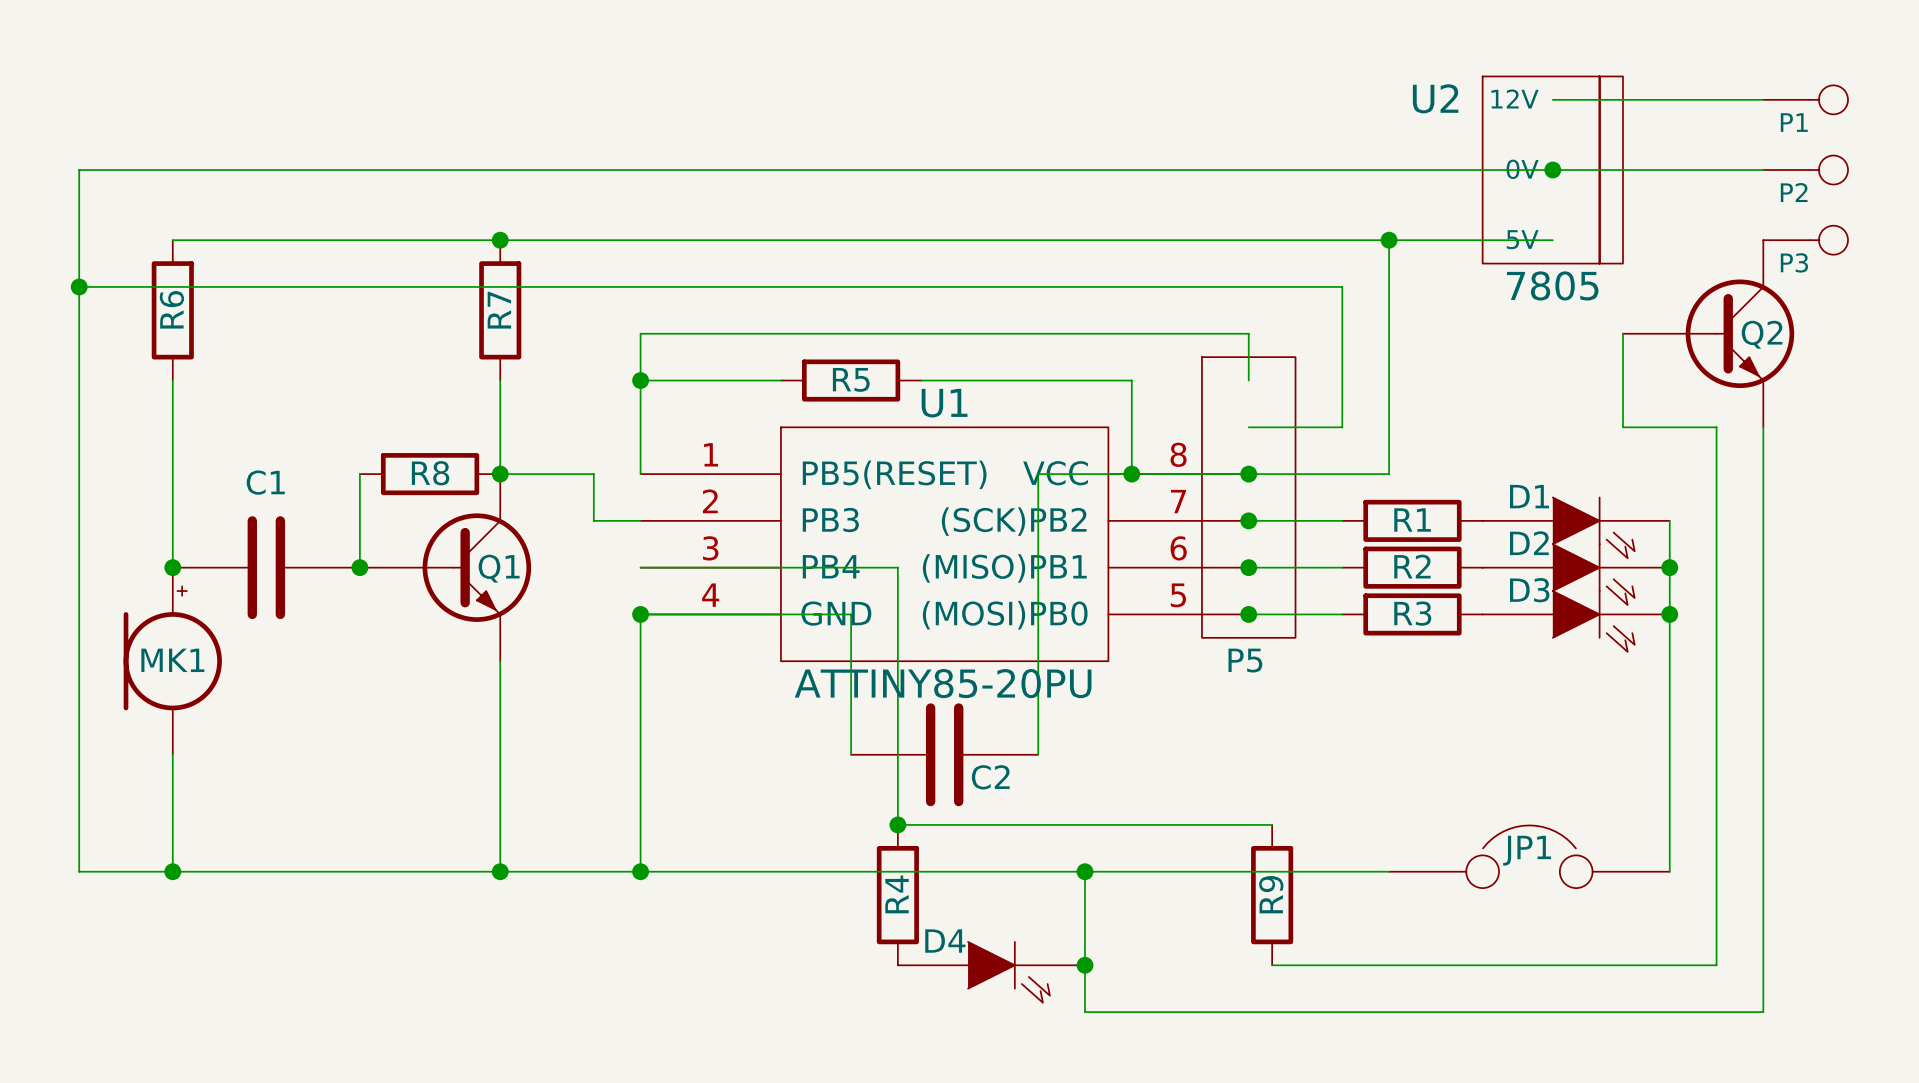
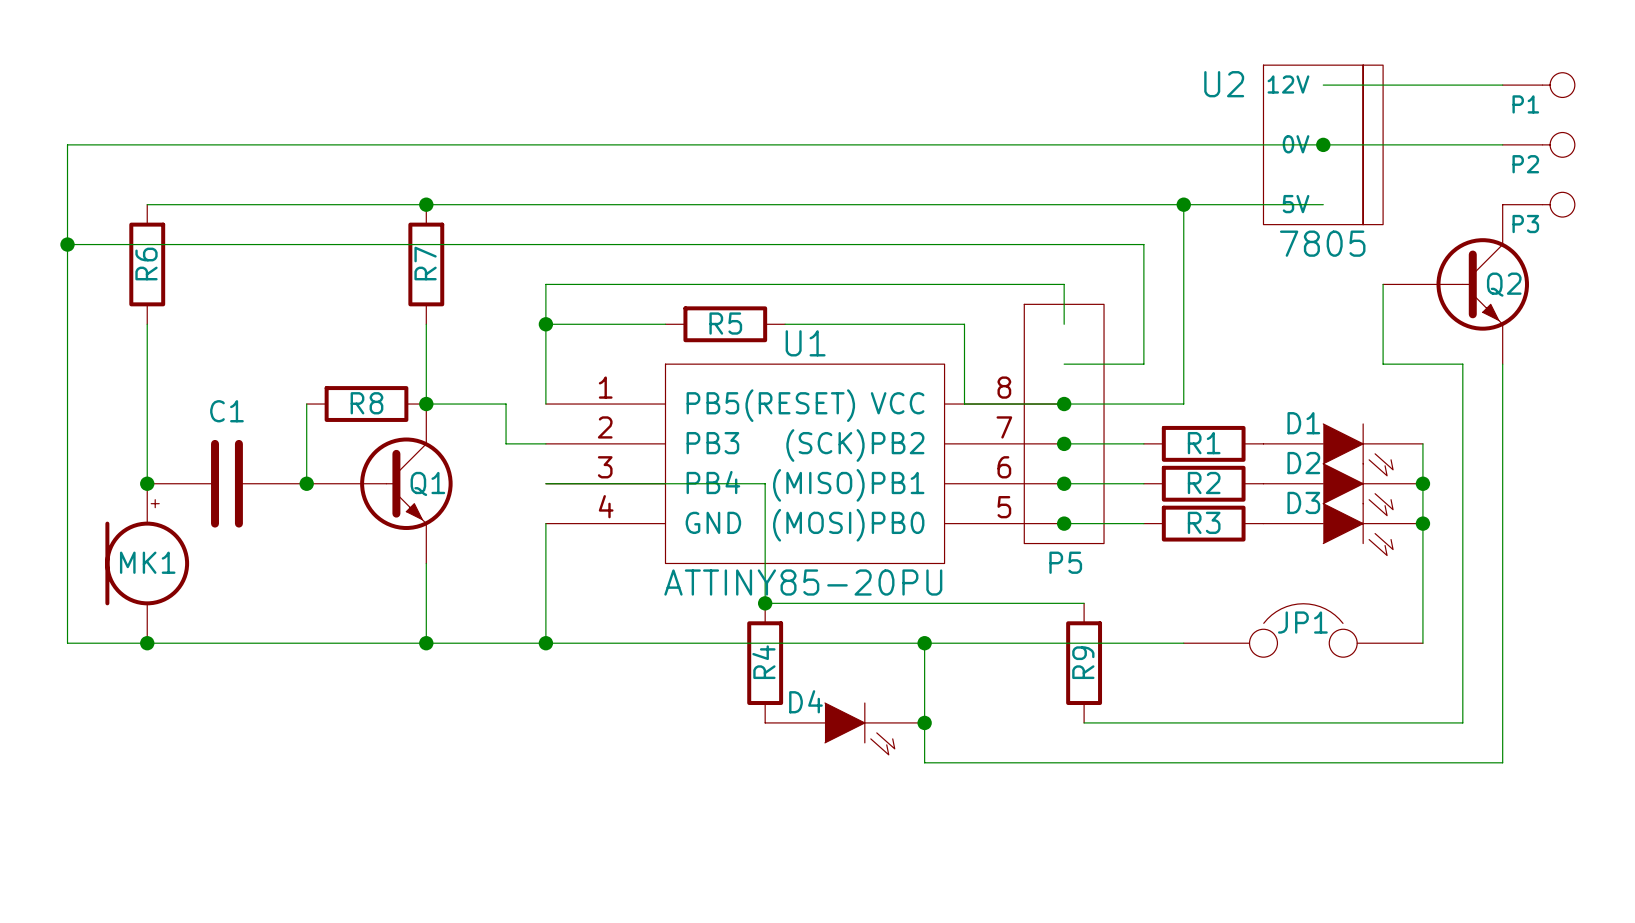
wire: (1131, 474) (1038, 474) (1038, 754) -> none
junction: (1131, 474) -> none
wire: (640, 614) (851, 614) (851, 754) -> none
junction: (640, 614) -> none
wire: (897, 708) (897, 824) (1272, 824) -> (765, 603) (1084, 603)
junction: none -> (765, 603)
wire: (79, 754) (79, 871) (1389, 871) -> (67, 643) (1183, 643)
wire: (172, 754) (172, 871) -> none
junction: none -> (147, 643)
wire: (500, 754) (500, 871) -> none
junction: none -> (426, 643)
wire: (640, 754) (640, 871) -> (924, 643) (924, 742)
junction: none -> (545, 643)
C2: (944, 754) -> none
junction: none -> (924, 643)
wire: (1669, 754) (1669, 871) -> none
junction: (897, 824) -> none
wire: (1716, 848) (1716, 965) (1272, 965) -> (1462, 722) (1084, 722)
JP1 position: (1529, 856) -> (1303, 630)
junction: (172, 871) -> none
junction: (500, 871) -> none
junction: (640, 871) -> none
junction position: (1085, 871) -> (924, 722)
R4 position: (897, 895) -> (765, 663)
wire: (1085, 895) (1085, 1012) (1763, 1012) (1763, 895) -> (924, 762) (1502, 762)
R9 position: (1272, 895) -> (1084, 663)
junction: (1085, 965) -> none
D4 position: (991, 972) -> (844, 728)

